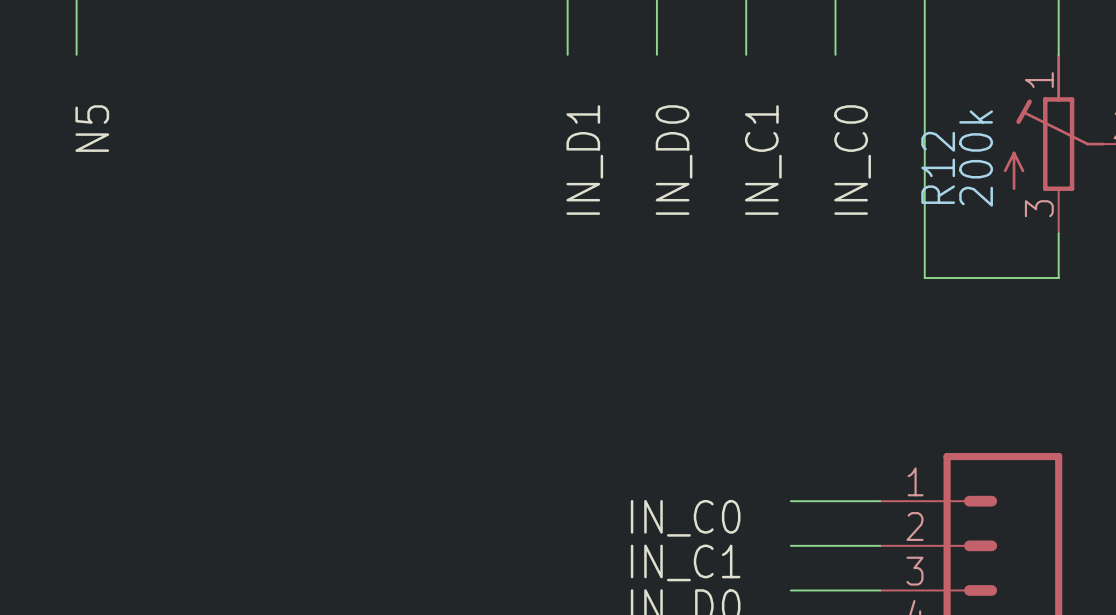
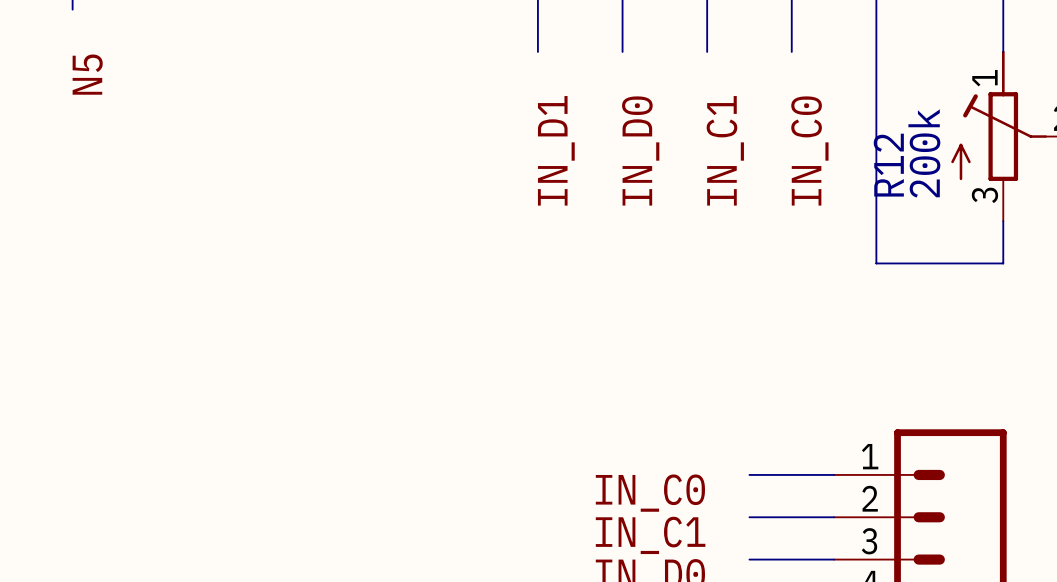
wire: (76, 10) (76, 54) -> none
label position: N5 (92, 128) -> N5 (87, 74)

